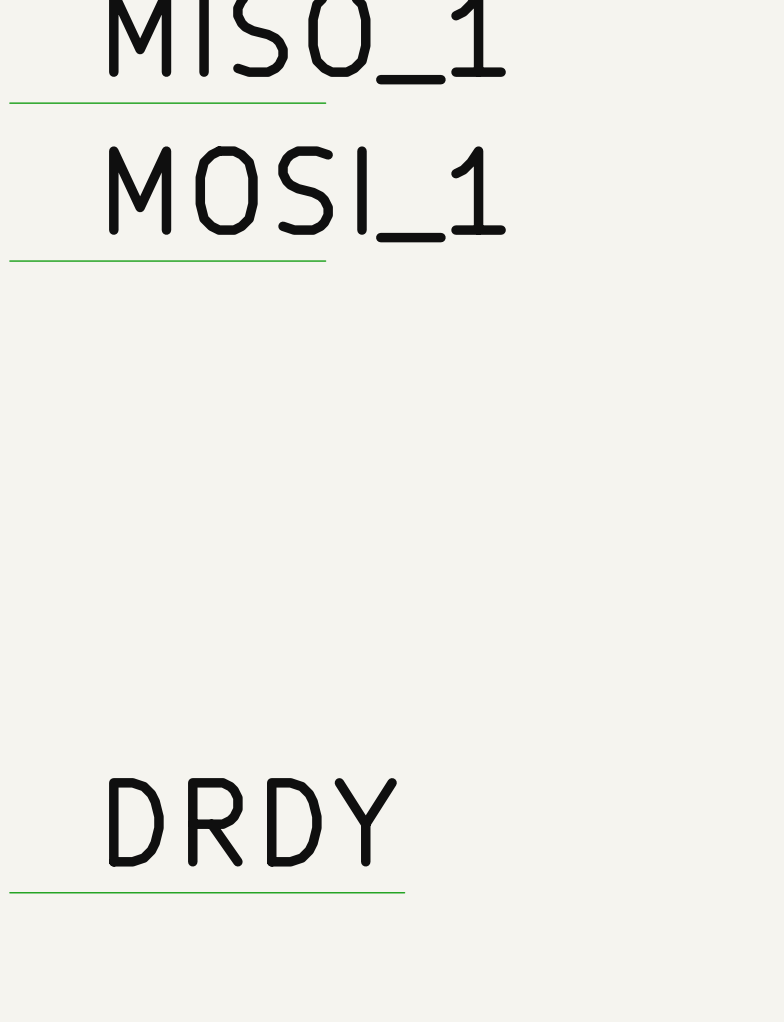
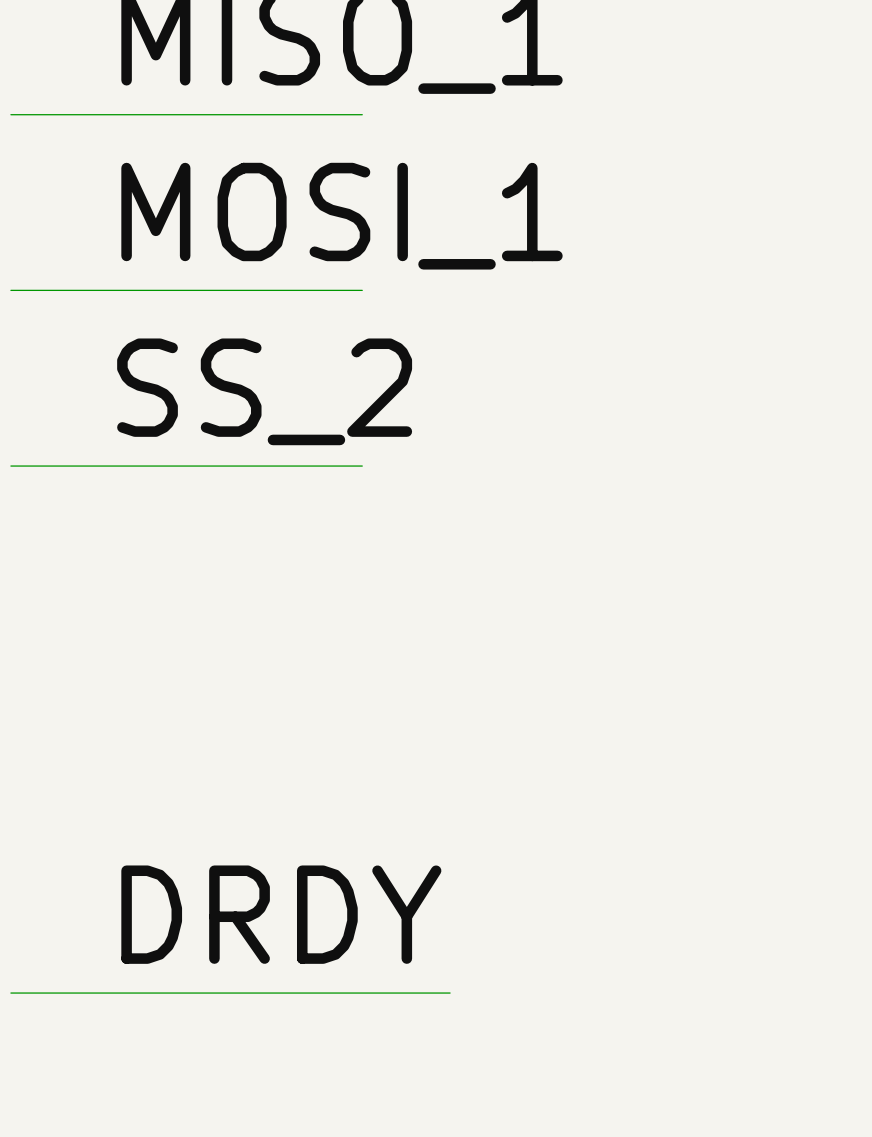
label: none -> SS_2 (264, 391)
wire: none -> (10, 466) (362, 466)

